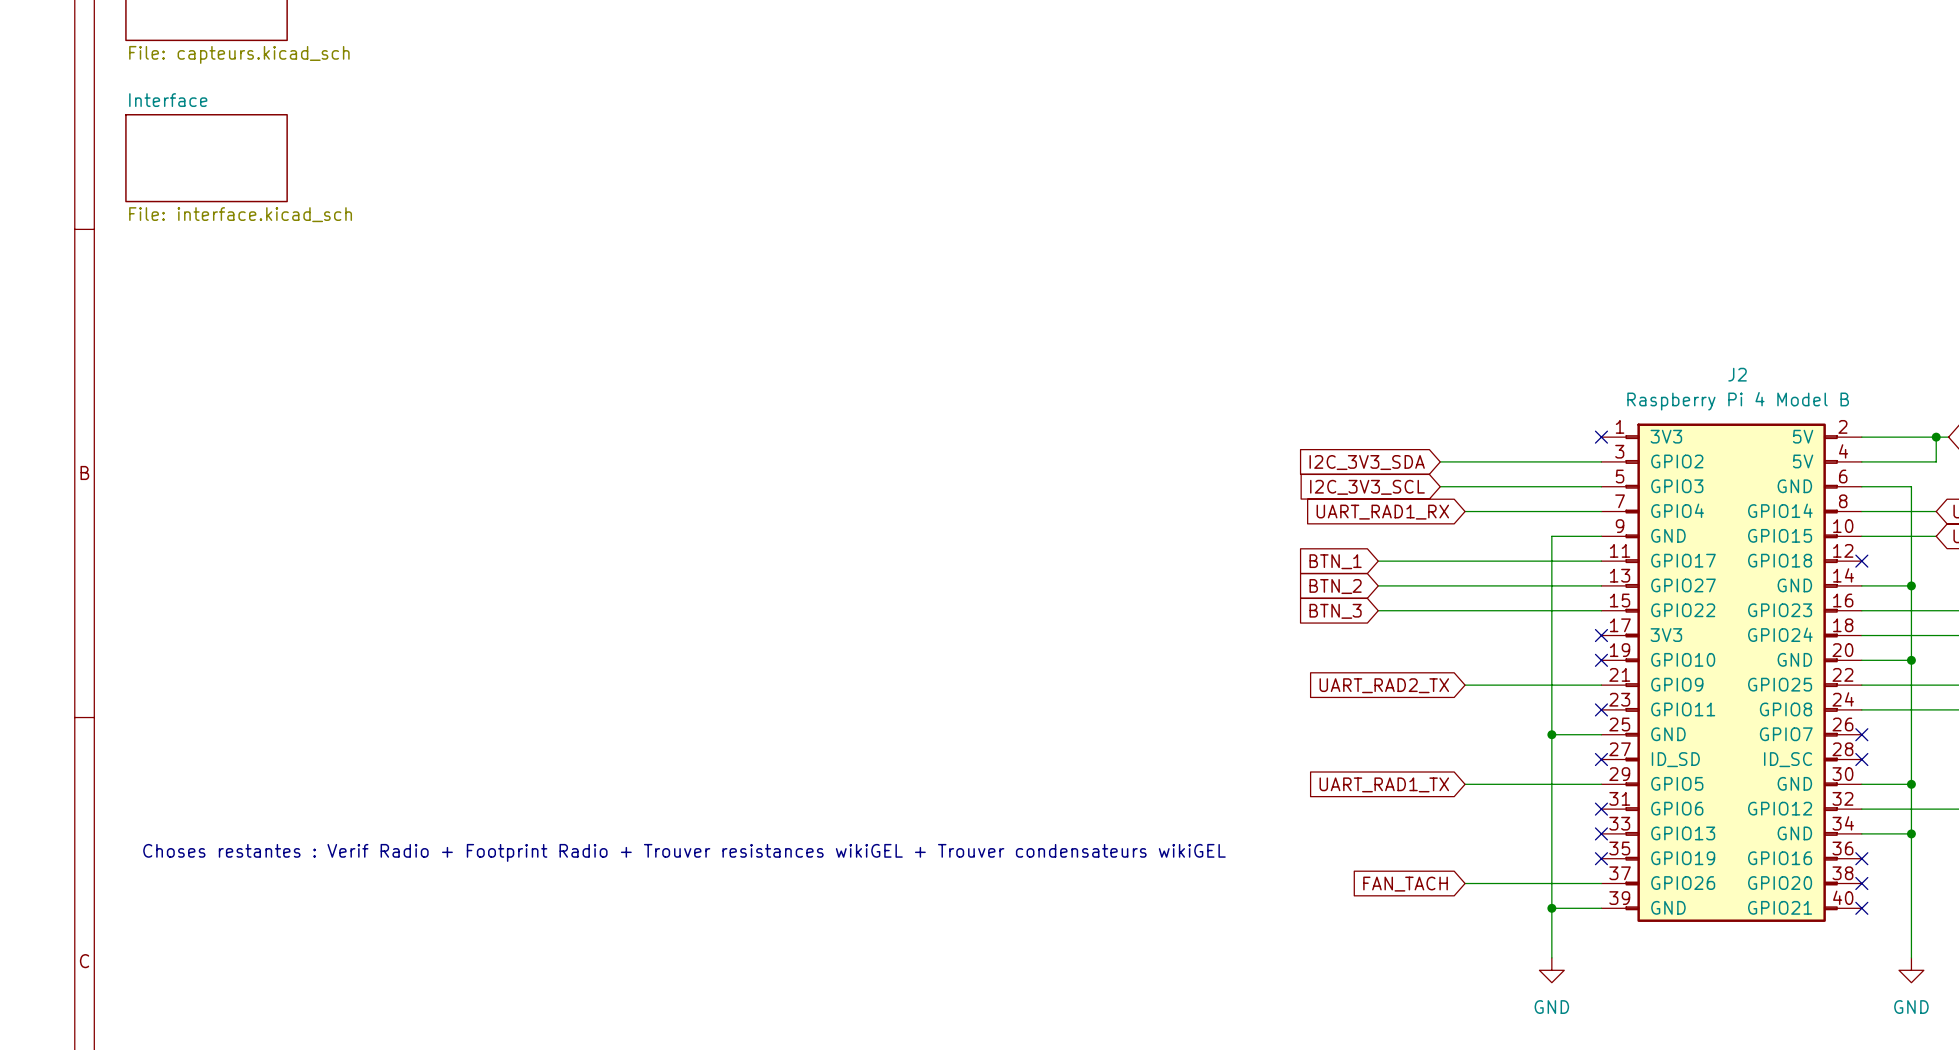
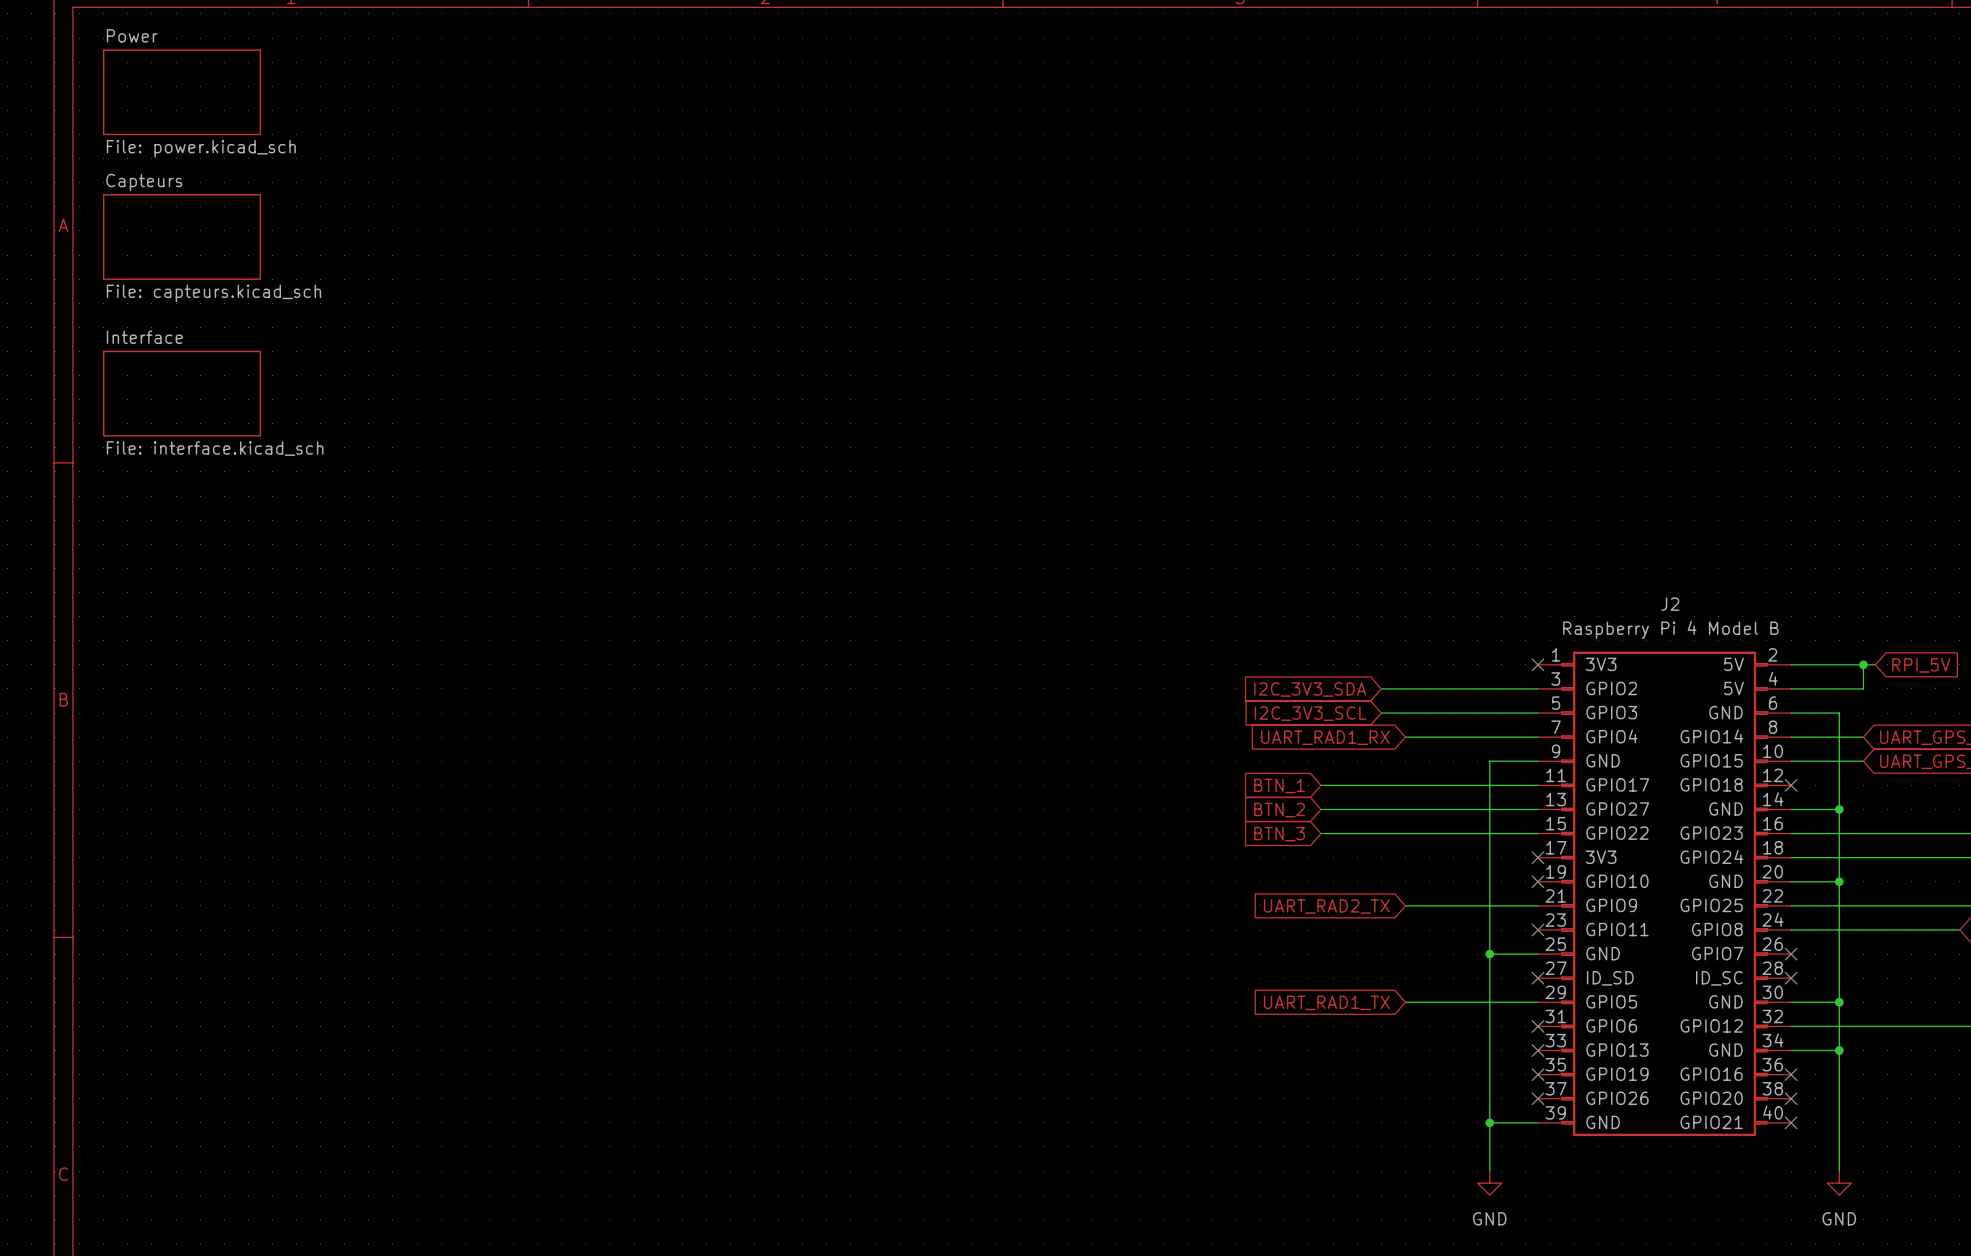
text: Choses restantes : Verif Radio + Footprint Radio + Trouver resistances wikiGEL + Trouver condensateurs wikiGEL (684, 852) -> none
wire: (1465, 883) (1601, 883) -> none
no-connect mark: none -> (1537, 1098)
global label: FAN_TACH (1405, 884) -> none

